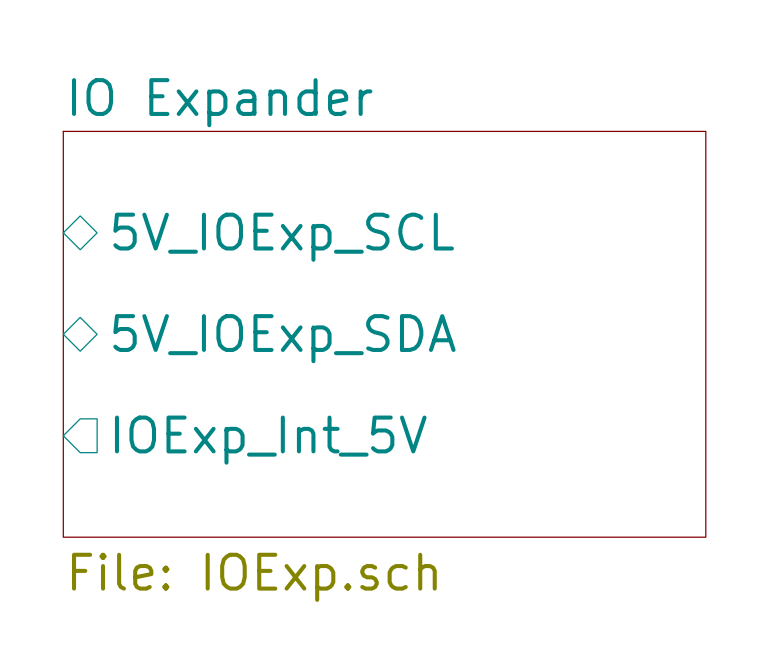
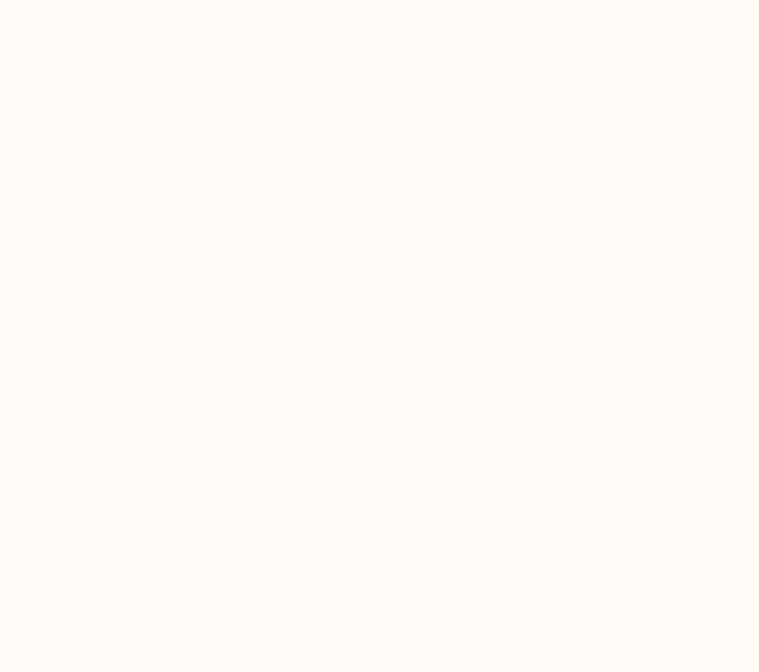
sheet pin: 5V_IOExp_SCL (283, 237) -> none
sheet IO Expander: File: IOExp.sch (384, 334) -> none
sheet pin: 5V_IOExp_SDA (284, 338) -> none
sheet pin: IOExp_Int_5V (270, 440) -> none

